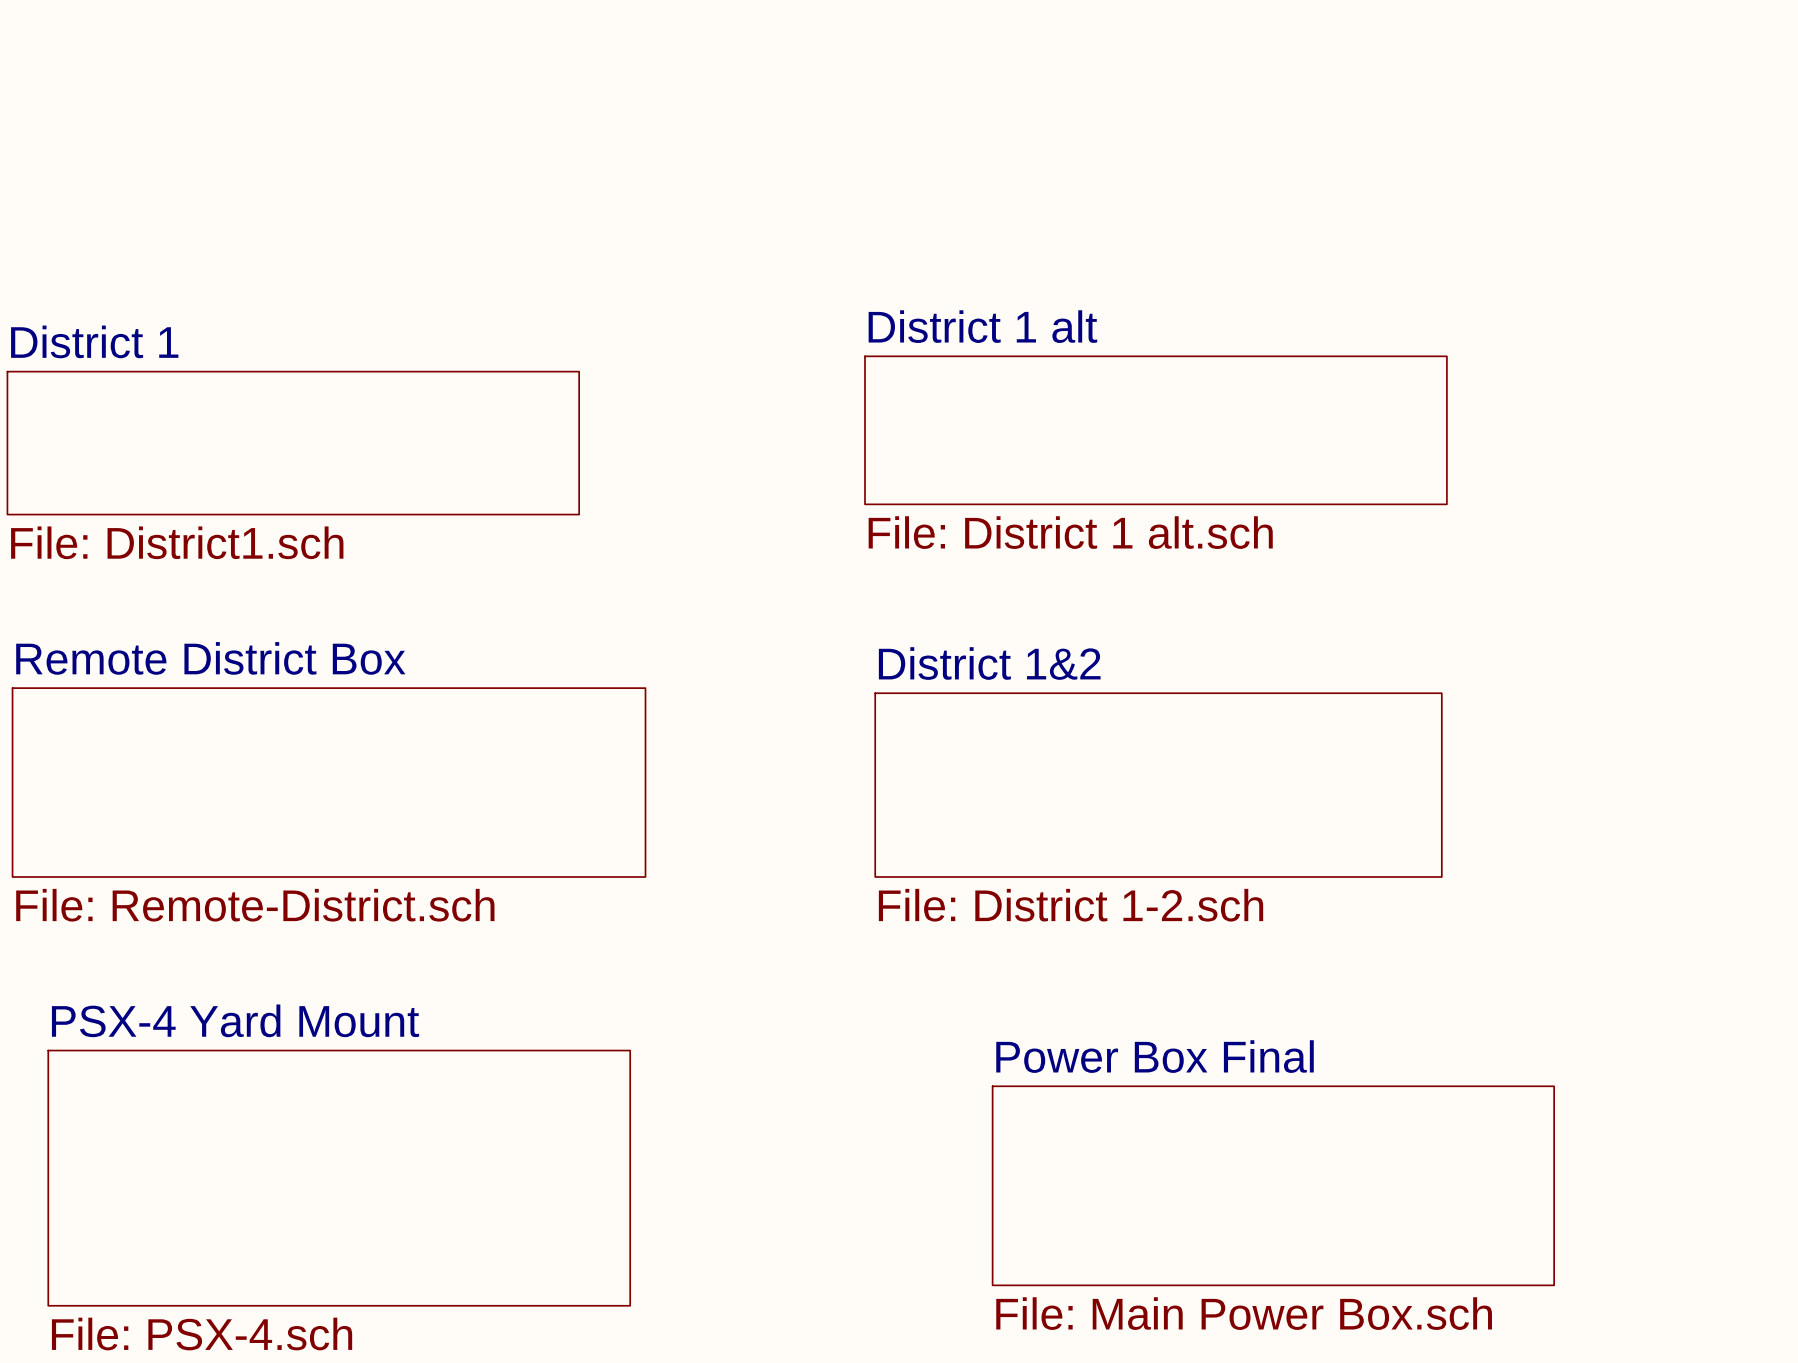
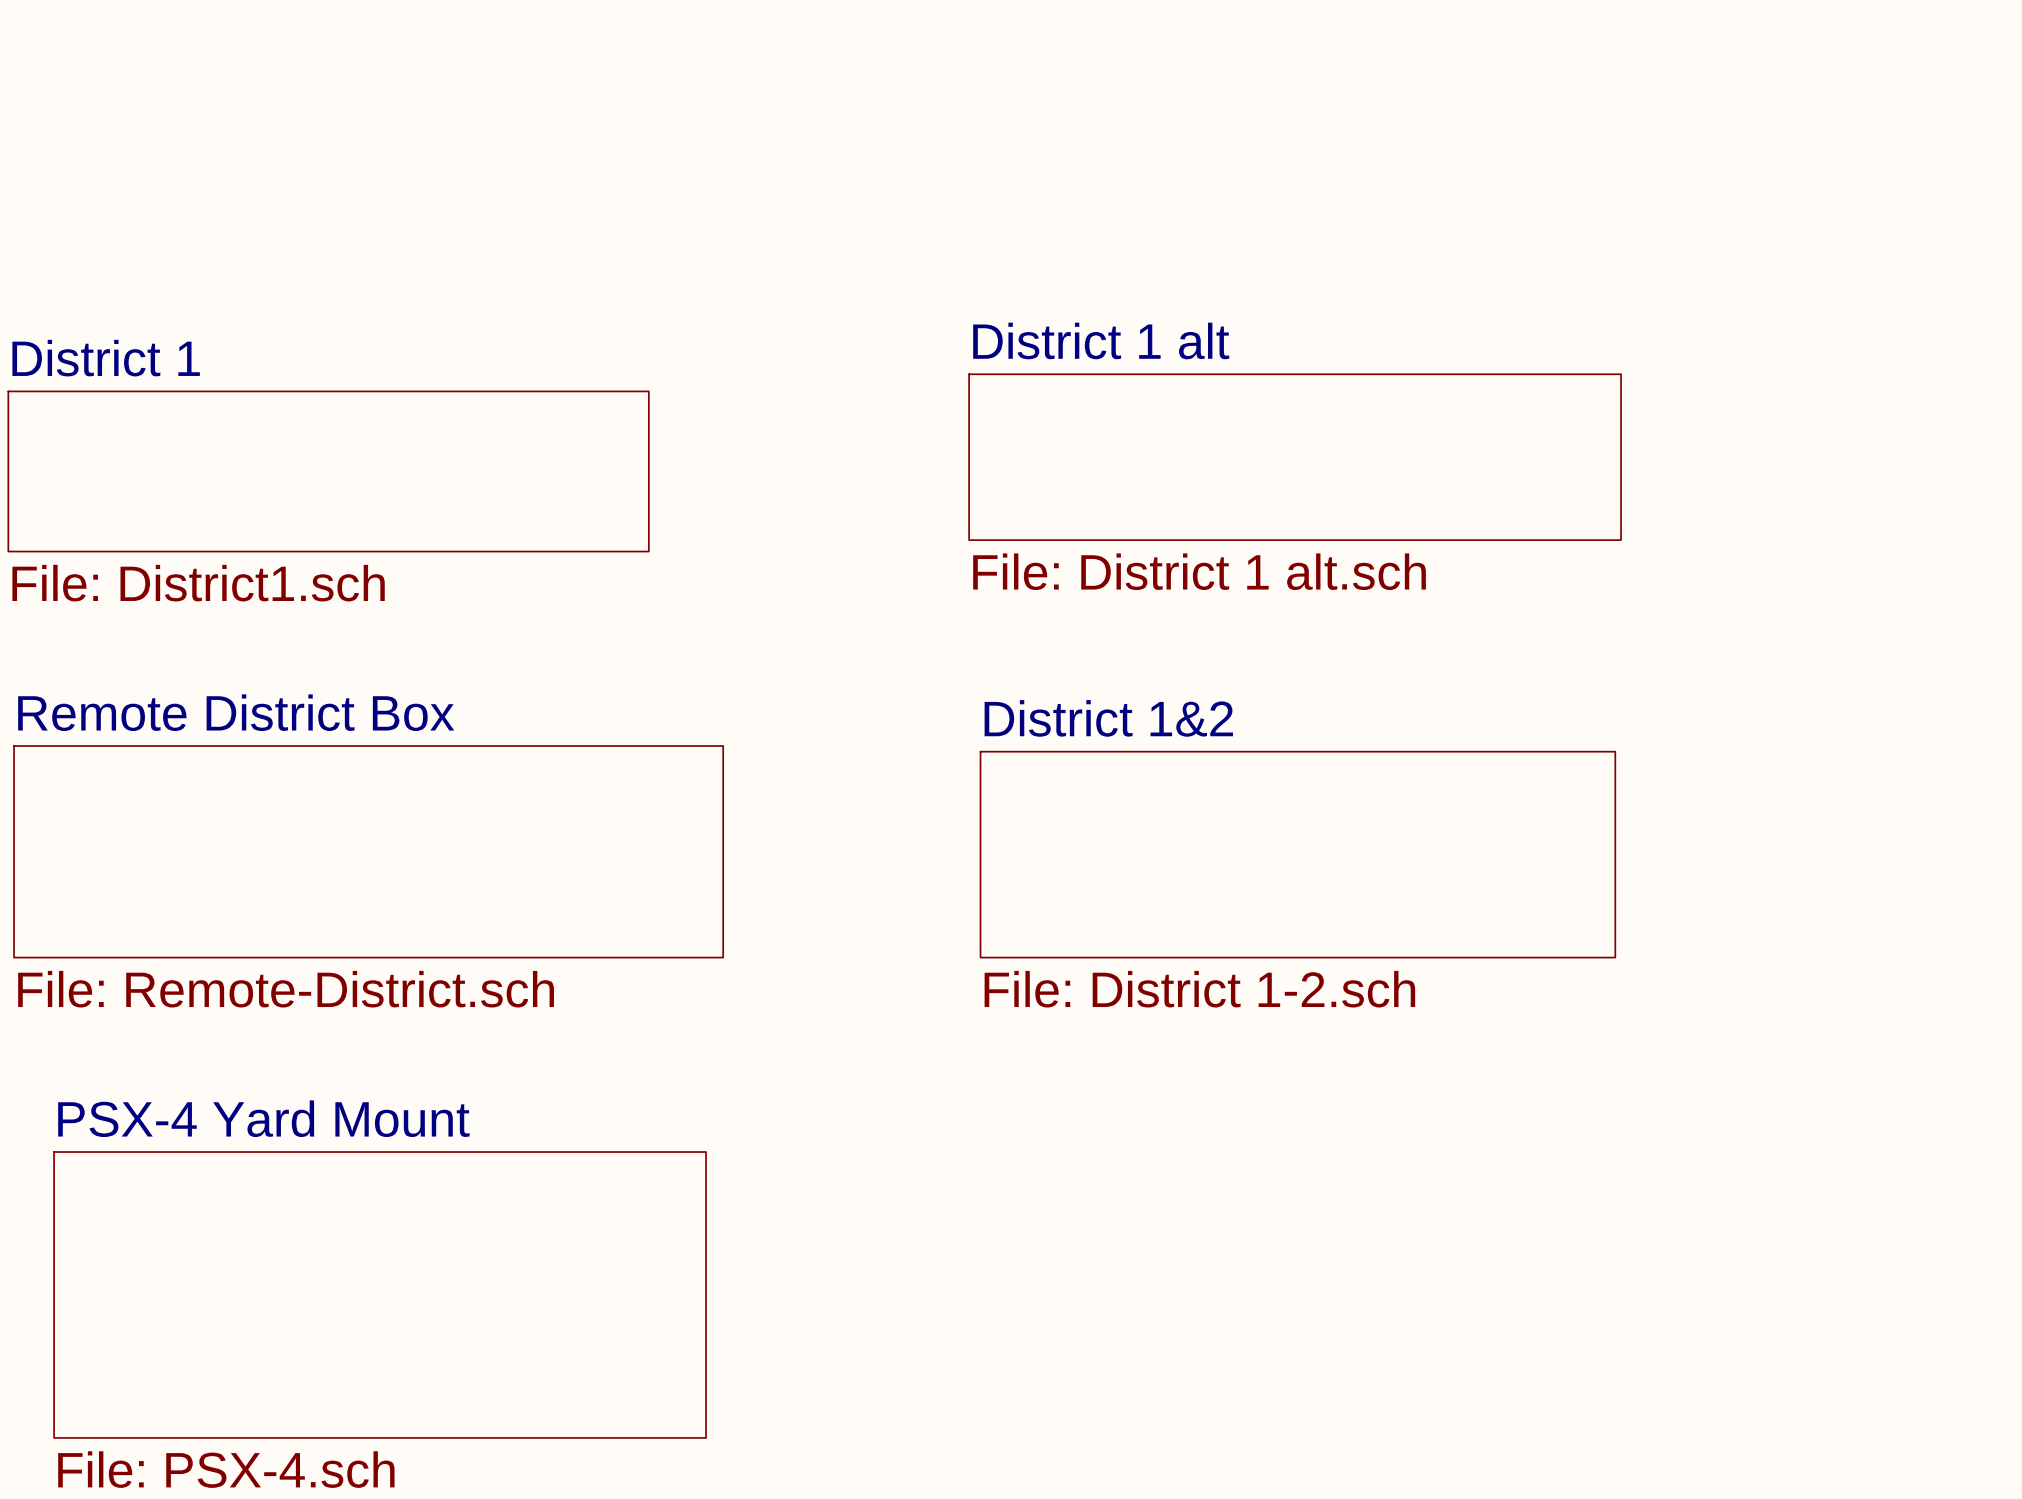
sheet Power Box Final: File: Main Power Box.sch (1273, 1185) -> none

